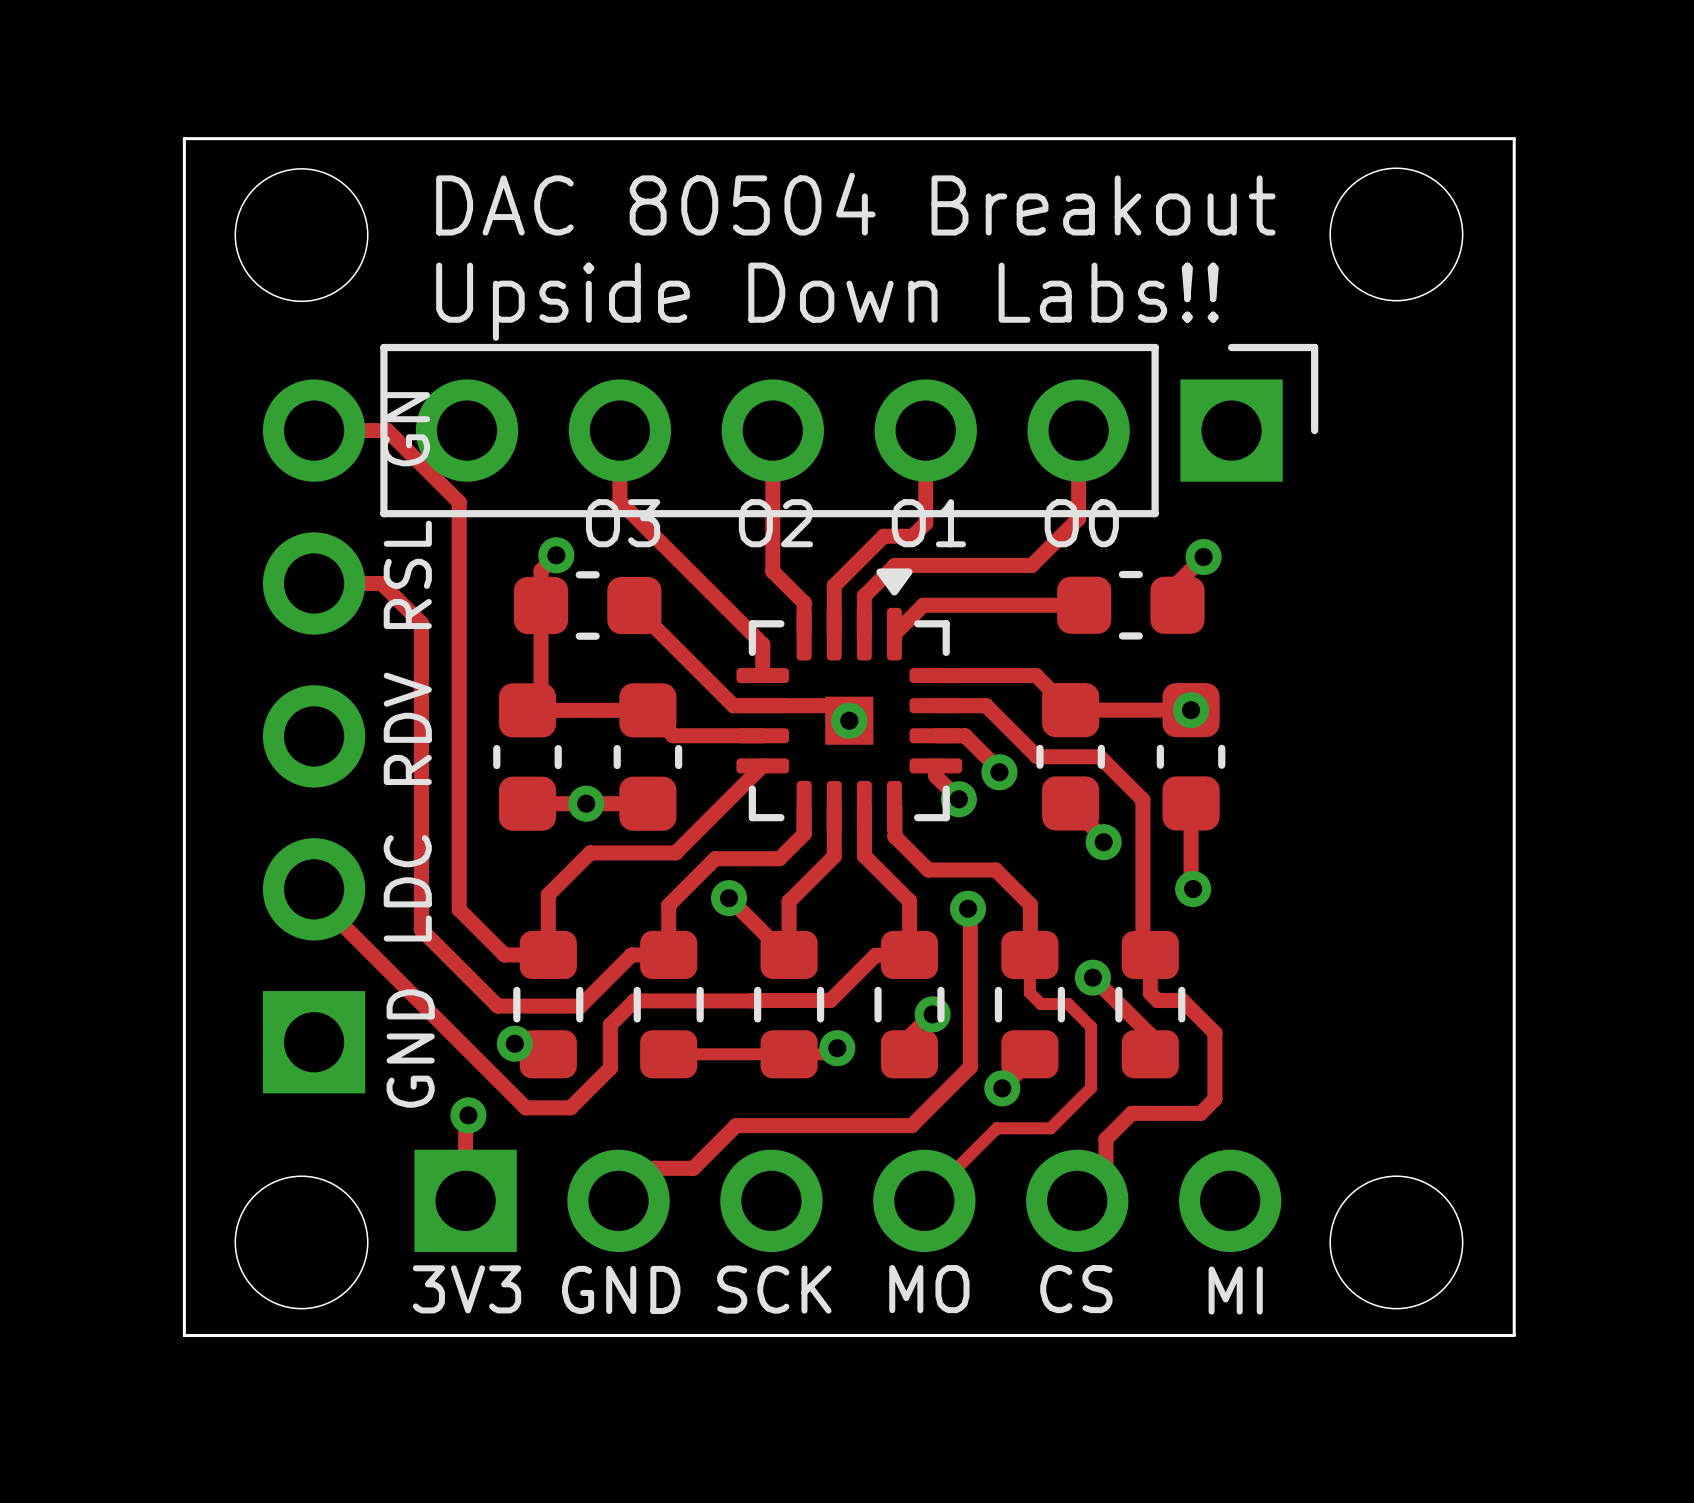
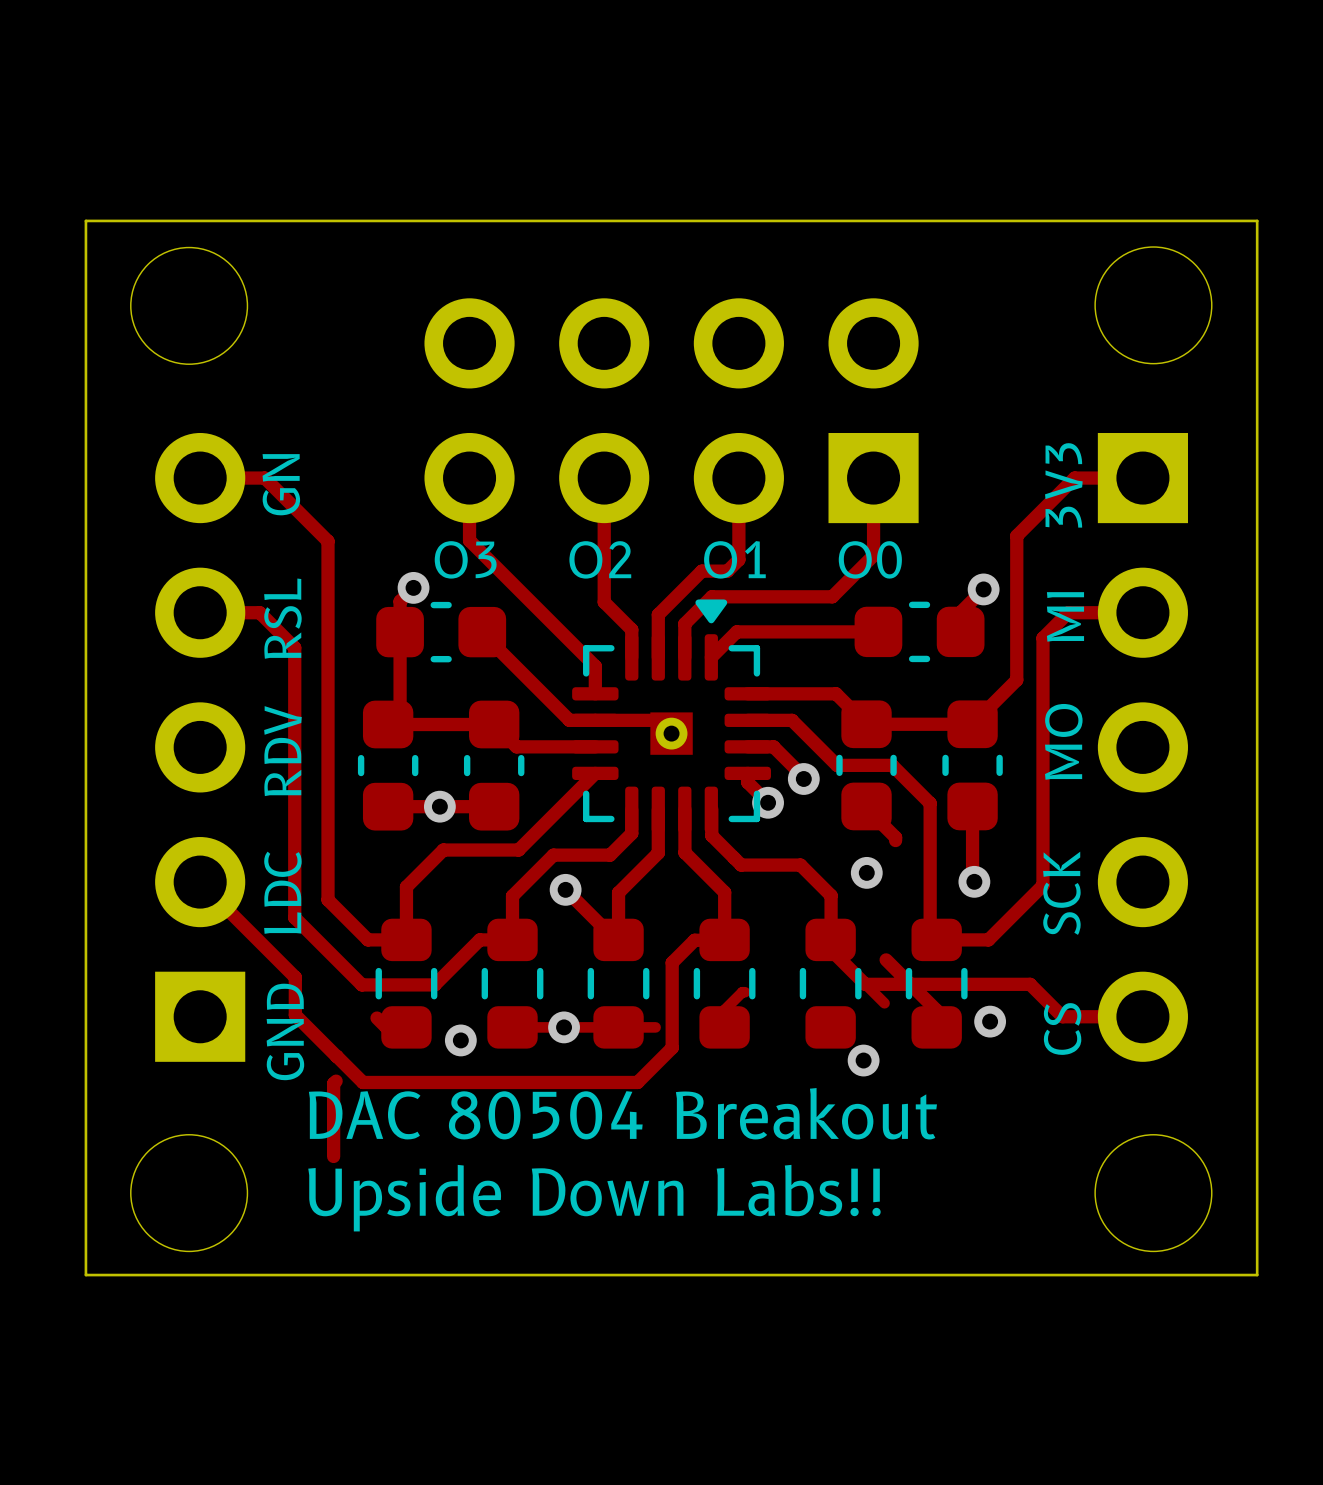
text position: DAC 80504 Breakout (855, 204) -> DAC 80504 Breakout (622, 1113)
text position: Upside Down Labs!! (827, 301) -> Upside Down Labs!! (594, 1198)
part: none -> (671, 410)
part: (849, 430) -> none
track: none -> (1142, 478) (1074, 478) (1016, 535) (1016, 680) (972, 724)
via: (1191, 710) -> none
part: none -> (1142, 747)
via position: (1103, 842) -> (866, 872)
track: (314, 889) (314, 896) (525, 1107) (570, 1107) (610, 1068) (610, 1024) (634, 1000) (752, 1000) -> (200, 882) (295, 977) (295, 1015) (362, 1082) (637, 1082) (672, 1047) (672, 962)
track: (968, 908) (970, 910) (970, 1067) (911, 1125) (736, 1125) (693, 1168) (651, 1168) (618, 1200) -> none
via: (968, 908) -> none
track: (1029, 954) (1029, 992) (1041, 1004) (1068, 1004) -> none
track: (1150, 954) (1150, 993) (1157, 1000) (1182, 1000) (1214, 1032) (1214, 1099) (1200, 1113) (1131, 1113) (1105, 1139) (1105, 1172) (1077, 1200) (1089, 1188) -> (936, 939) (988, 939) (1042, 885) (1042, 638) (1068, 612) (1142, 612)
track: none -> (830, 949) (865, 984) (1030, 984) (1062, 1016) (1142, 1016)
via: (1092, 977) -> none
track: (850, 980) (830, 1000) (752, 1000) -> none
via: (932, 1014) -> none
track: (1091, 1026) (1091, 1087) (1050, 1128) (996, 1128) (924, 1200) -> none
via: (514, 1043) -> none
via: none -> (990, 1021)
via: (837, 1048) -> none
via: none -> (564, 1027)
via: none -> (460, 1040)
via: (1002, 1088) -> none
via: none -> (863, 1060)
via: (468, 1115) -> none
part: (847, 1200) -> none
text rotation: 0° (467, 1289) -> 90° counterclockwise (1063, 485)
text position: 3V3 (467, 1289) -> 3V3 (1063, 485)
text: GND (621, 1289) -> none
text rotation: 0° (774, 1289) -> 90° counterclockwise (1061, 893)
text position: SCK (774, 1289) -> SCK (1061, 893)
text rotation: 0° (929, 1289) -> 90° counterclockwise (1063, 741)
text position: MO (929, 1289) -> MO (1063, 741)
text rotation: 0° (1076, 1289) -> 90° counterclockwise (1062, 1029)
text position: CS (1076, 1289) -> CS (1062, 1029)
text rotation: 0° (1235, 1290) -> 90° counterclockwise (1065, 616)
text position: MI (1235, 1290) -> MI (1065, 616)

